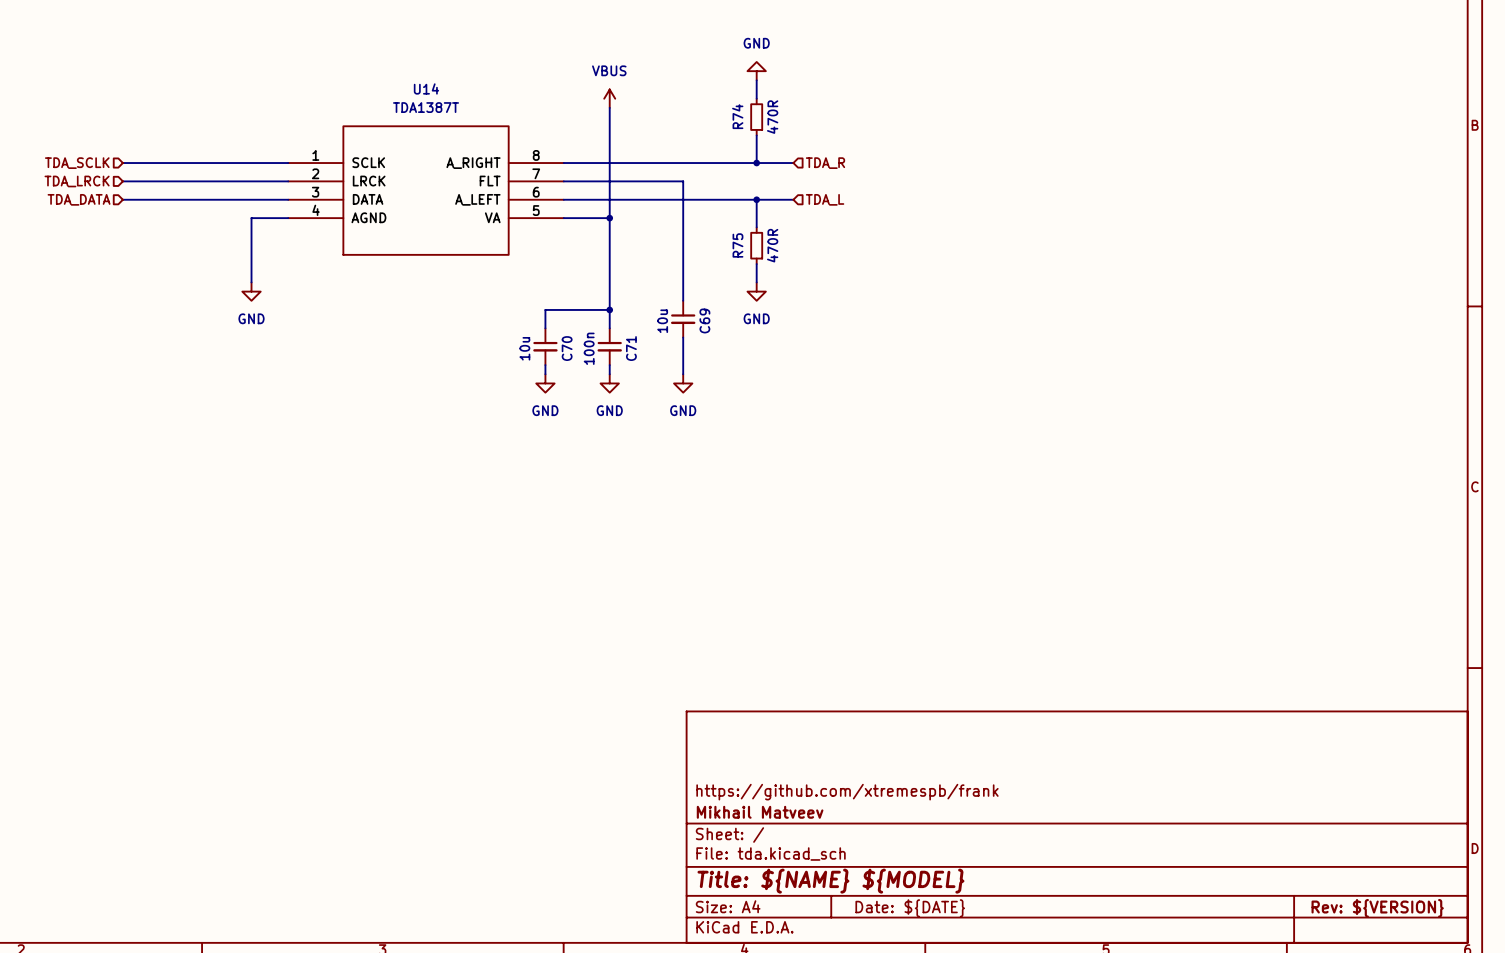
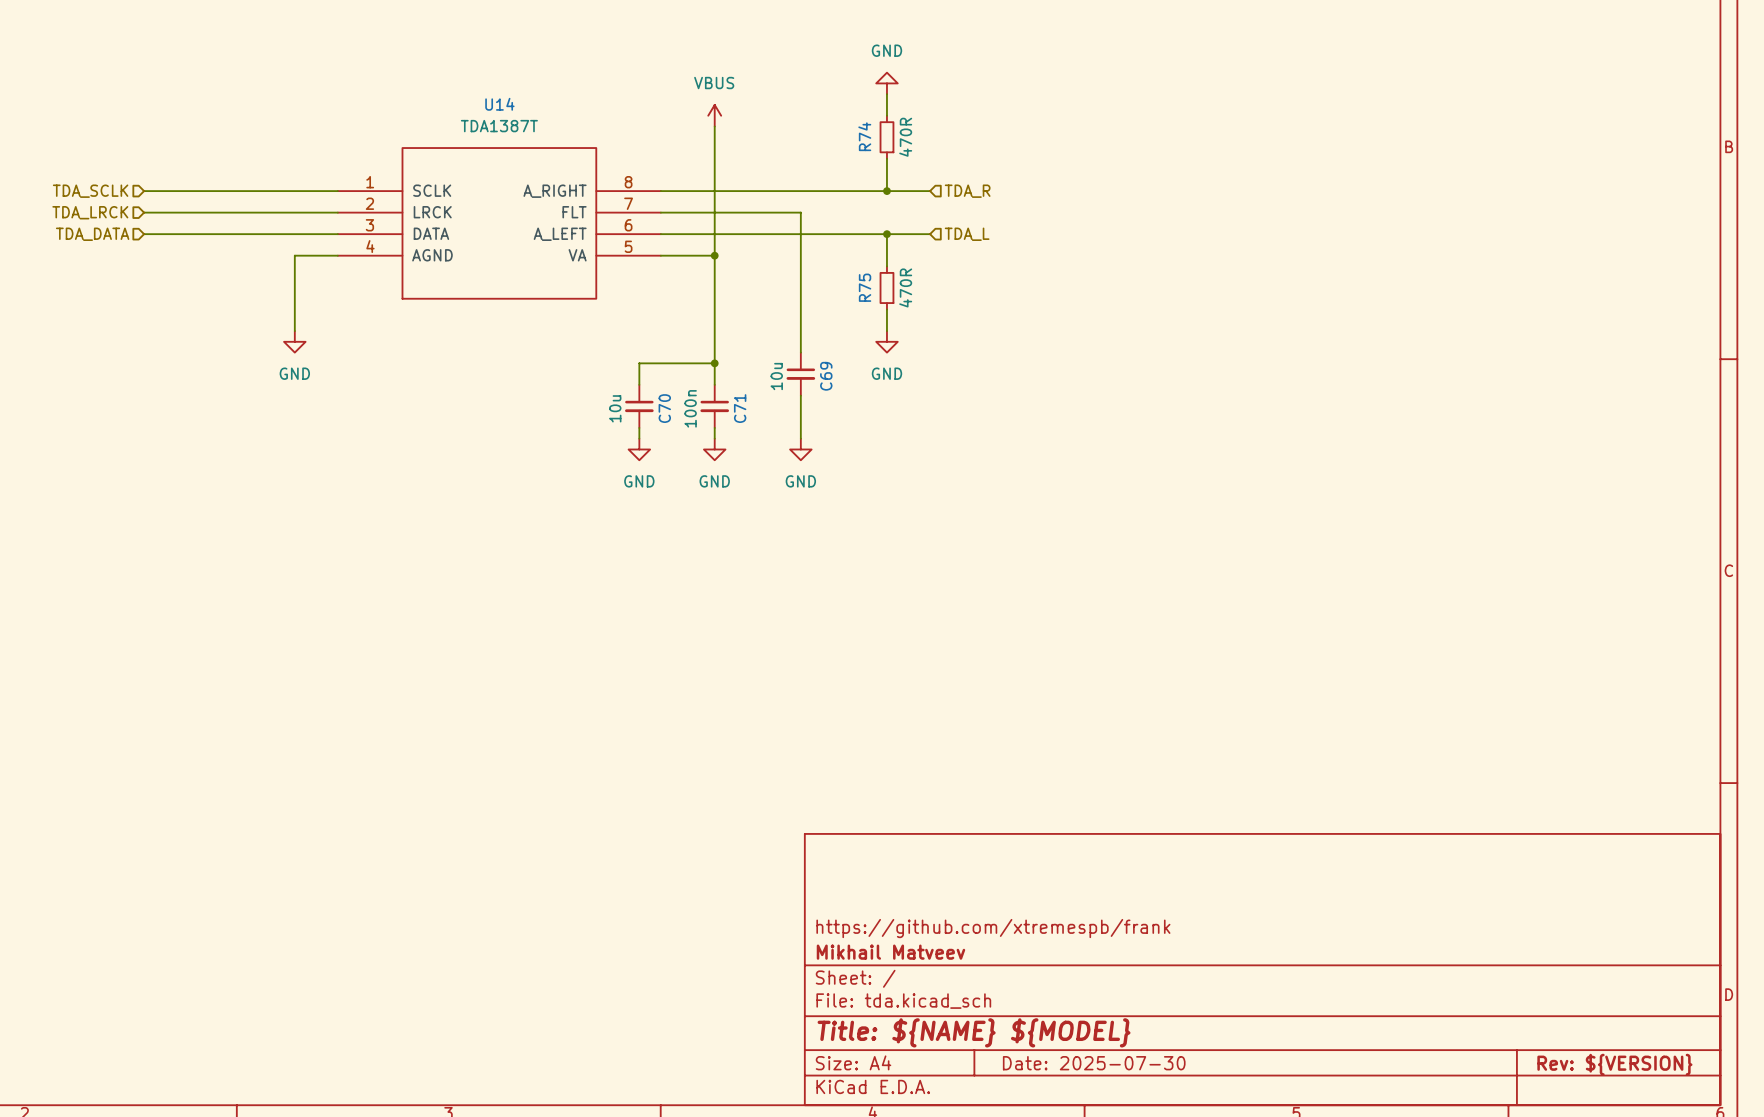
title block: Date: ${DATE} (910, 908) -> Date: 2025-07-30 (1094, 1063)

